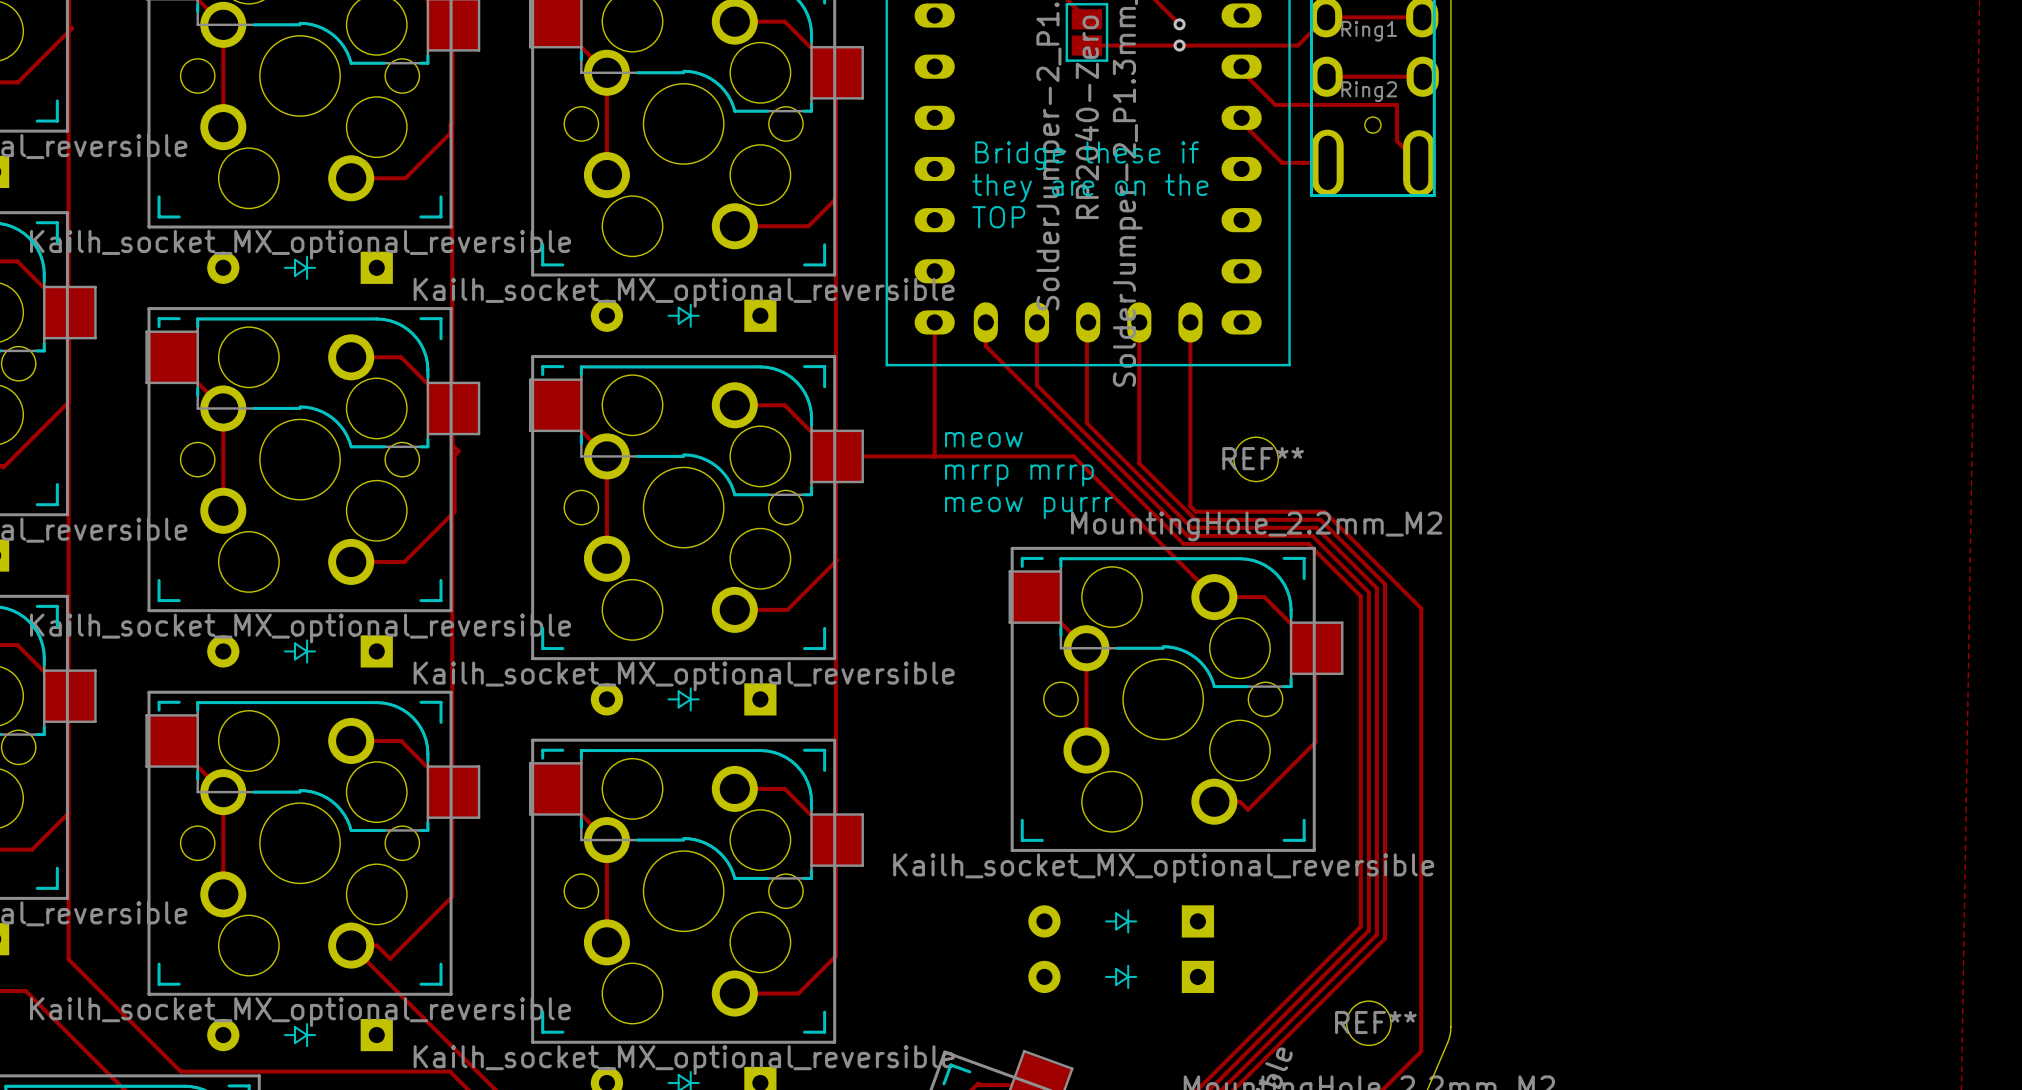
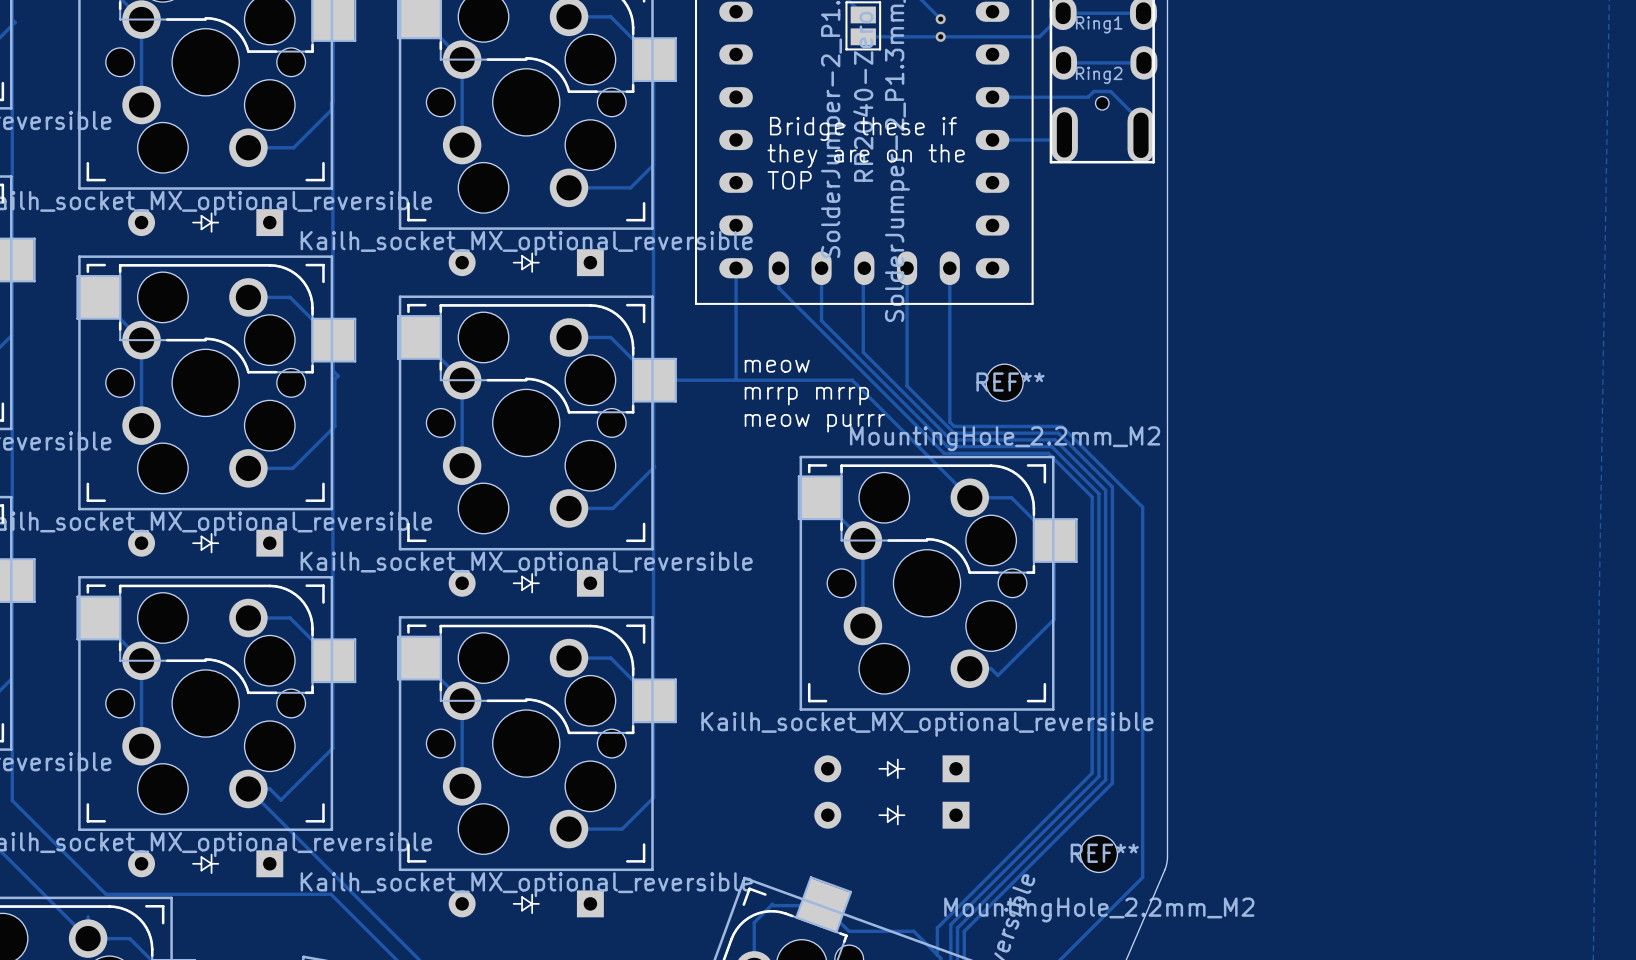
track: (1243, 72) (1275, 104) (1397, 104) (1397, 141) (1419, 163) -> (992, 97) (1088, 97) (1093, 91) (1110, 91) (1140, 121) (1140, 135)
track: (1243, 123) (1282, 162) (1327, 162) -> (992, 139) (1059, 139) (1064, 134)

